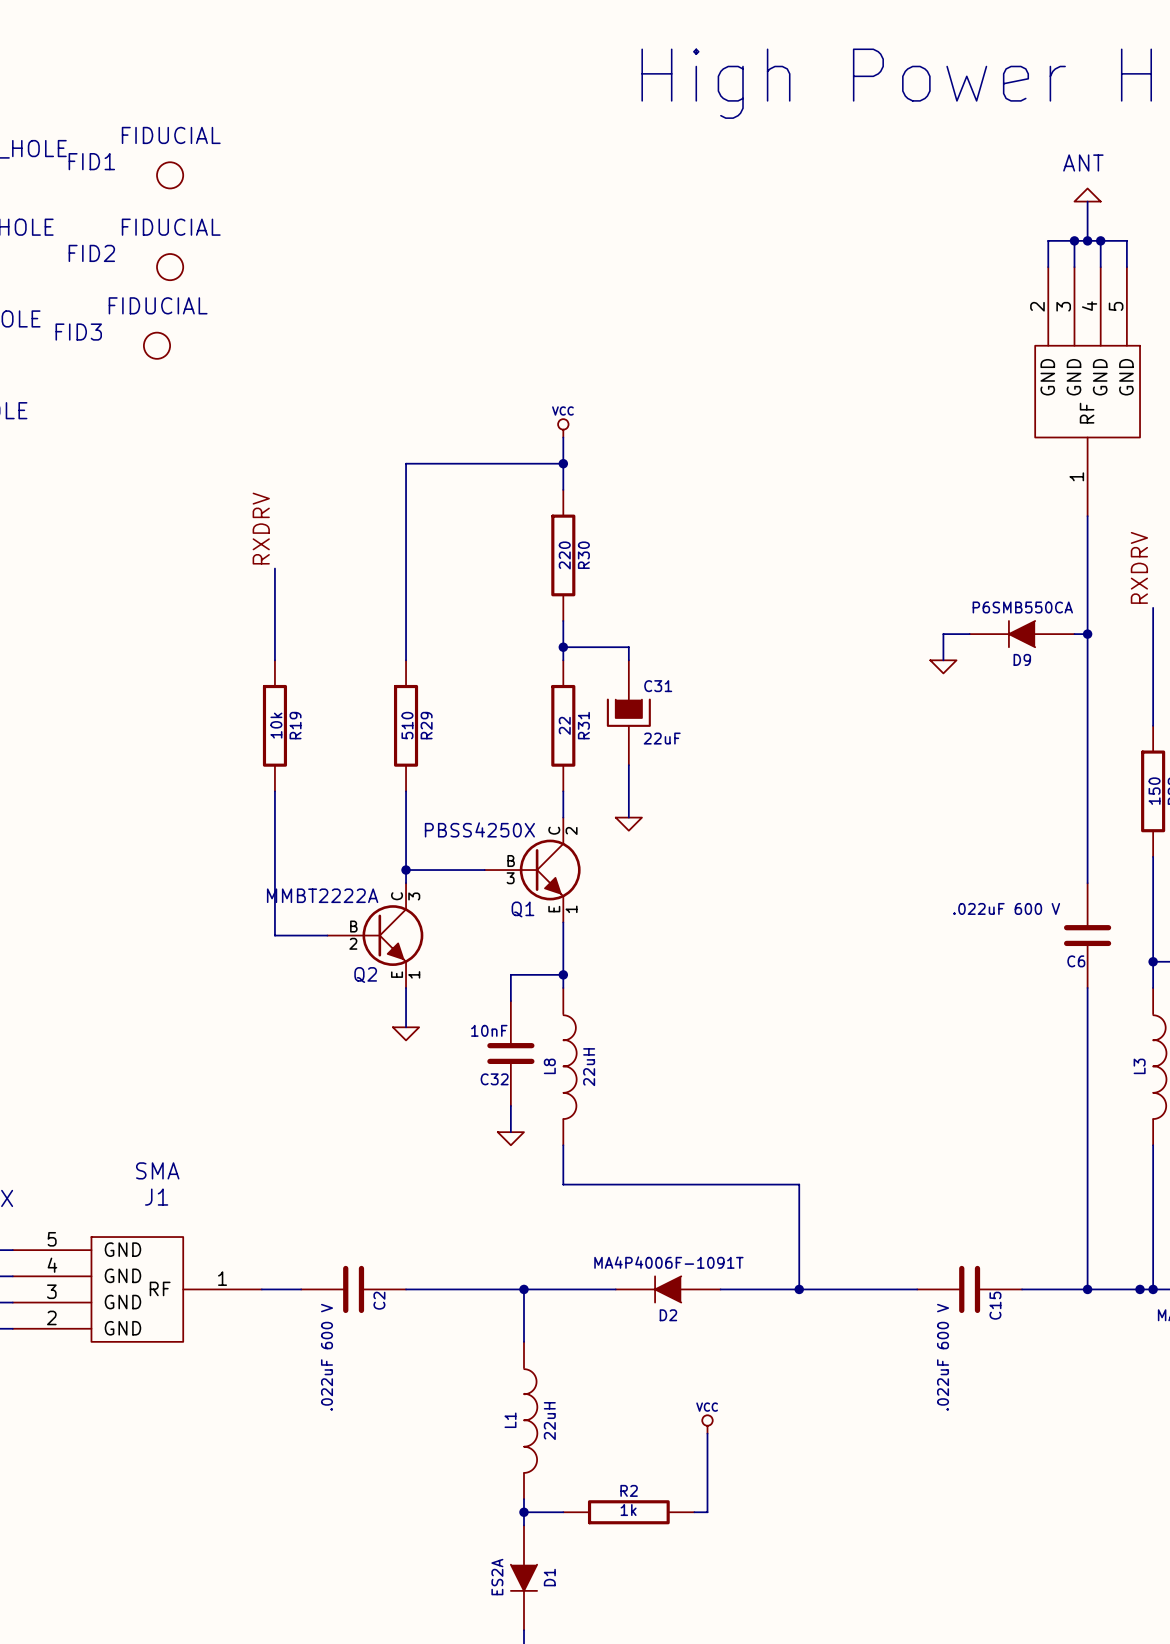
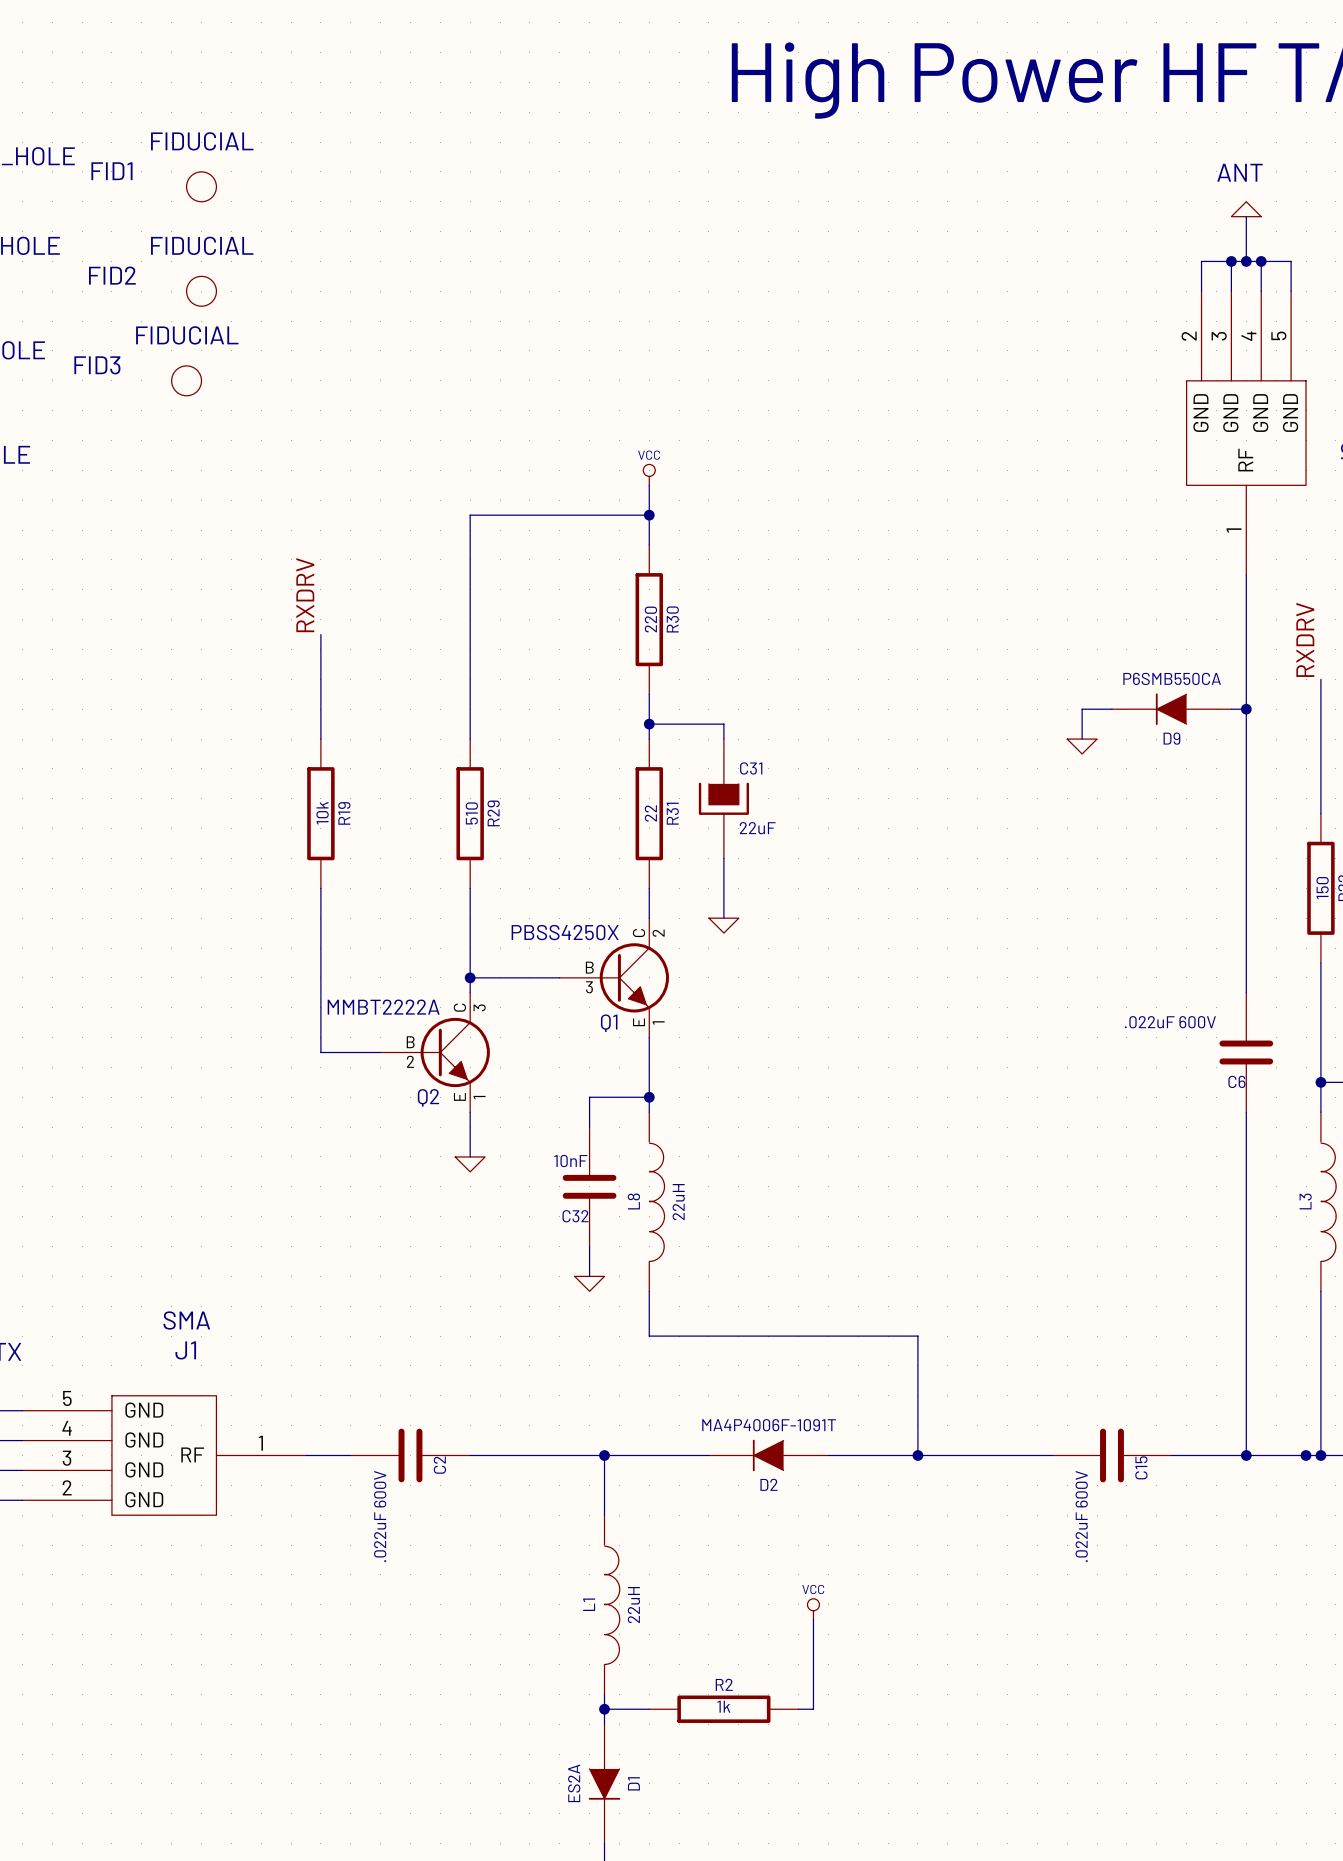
C6 value: .022uF 600 V (1006, 908) -> .022uF 600V (1170, 1022)
C2 value: .022uF 600 V (327, 1357) -> .022uF 600V (380, 1516)
C15 value: .022uF 600 V (943, 1357) -> .022uF 600V (1081, 1516)

